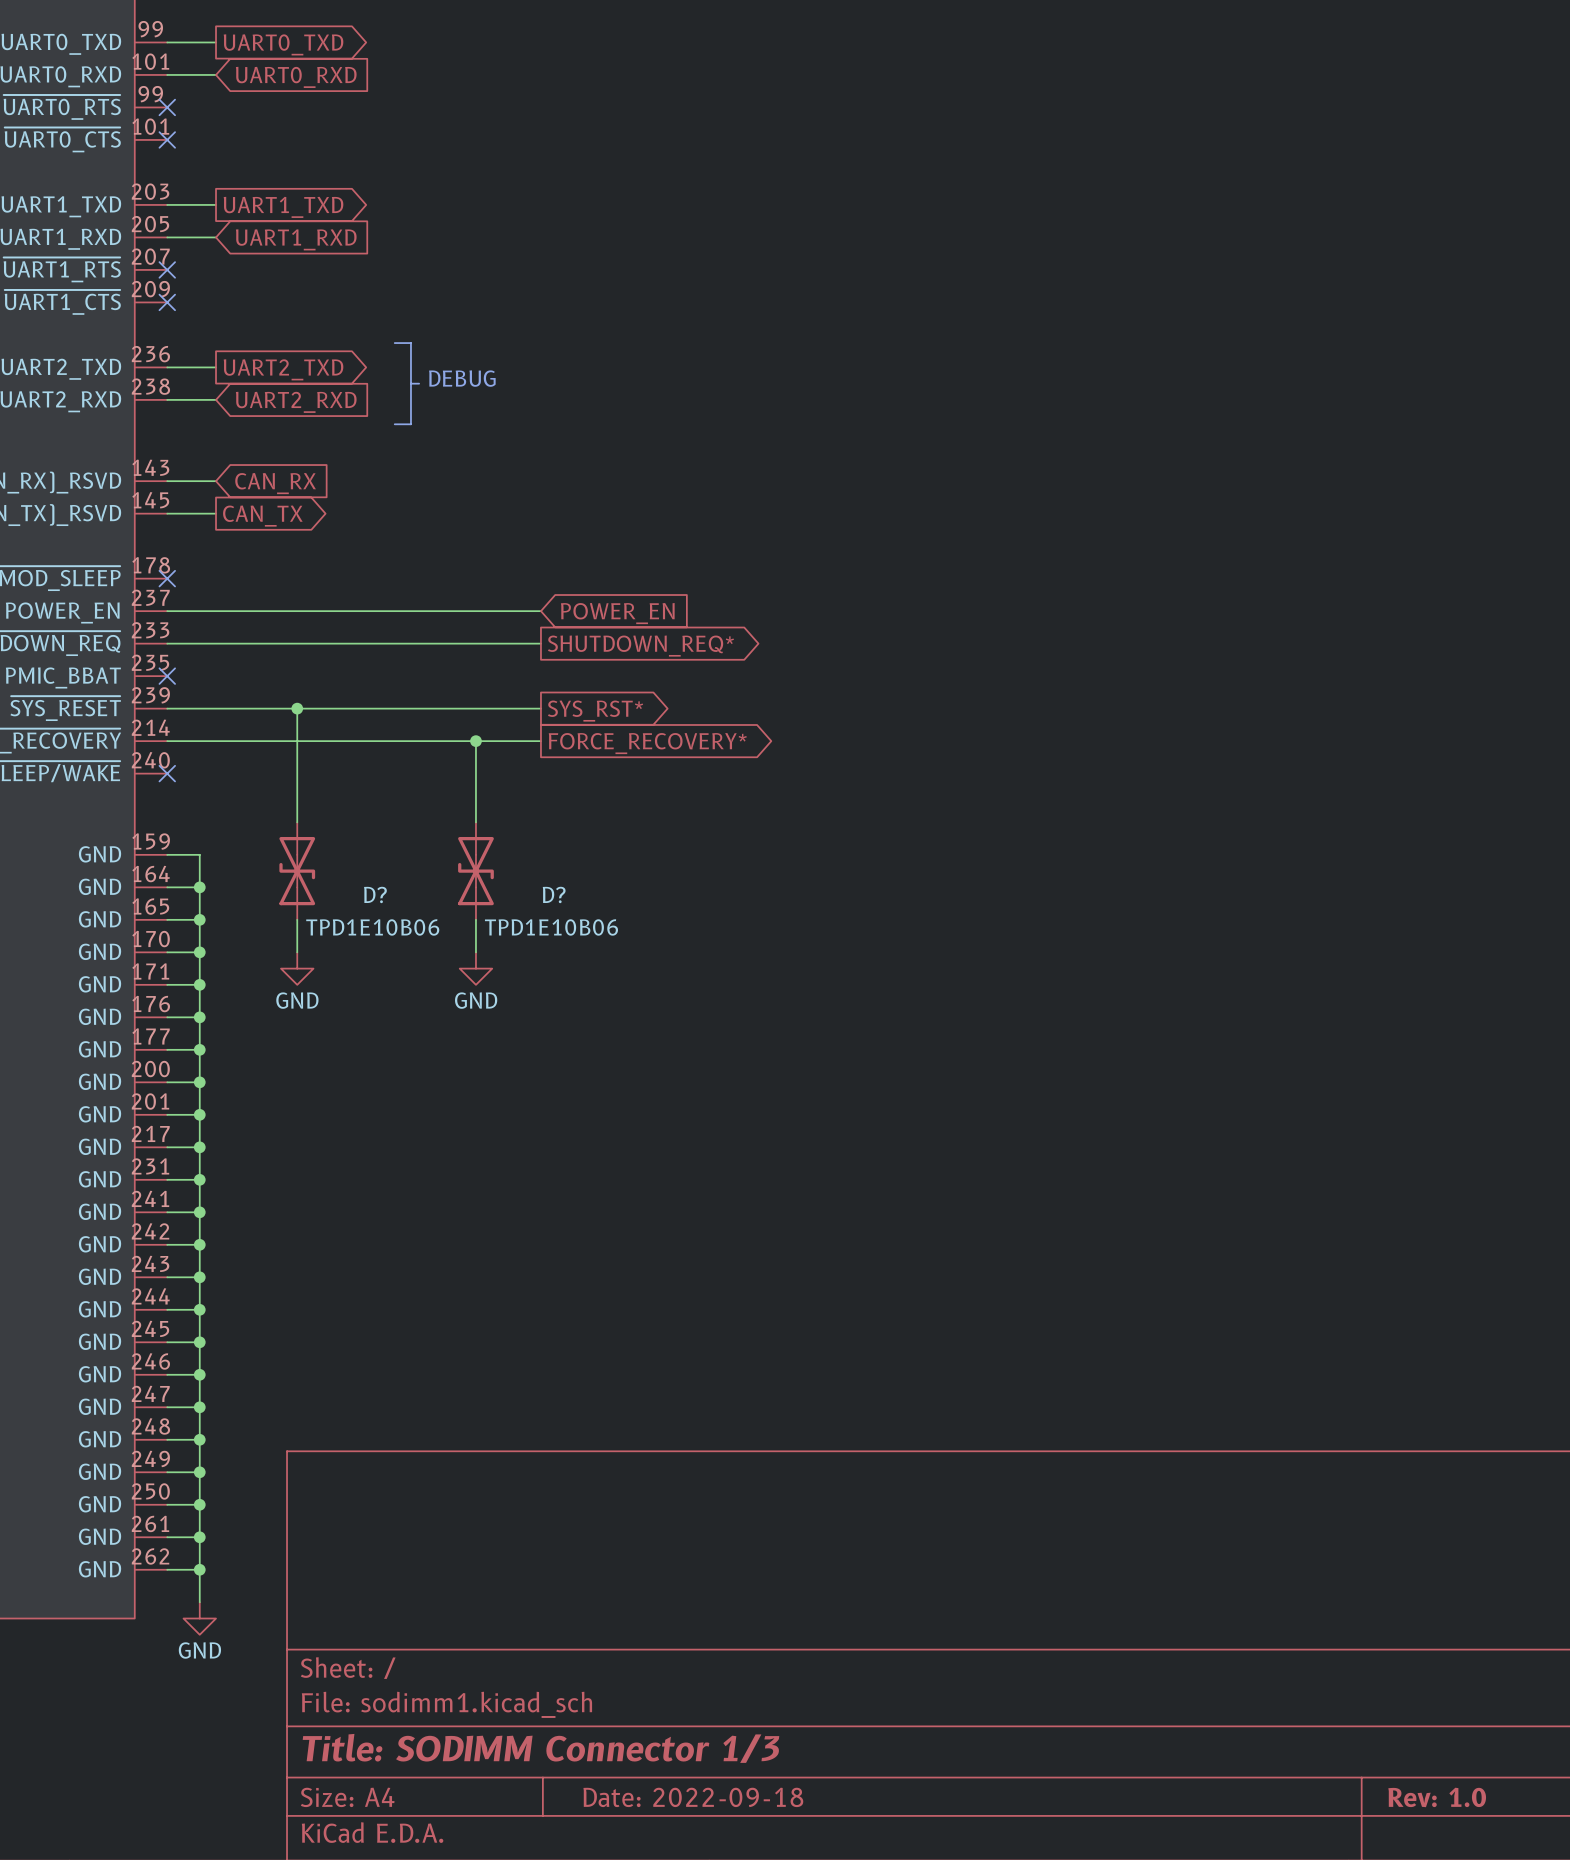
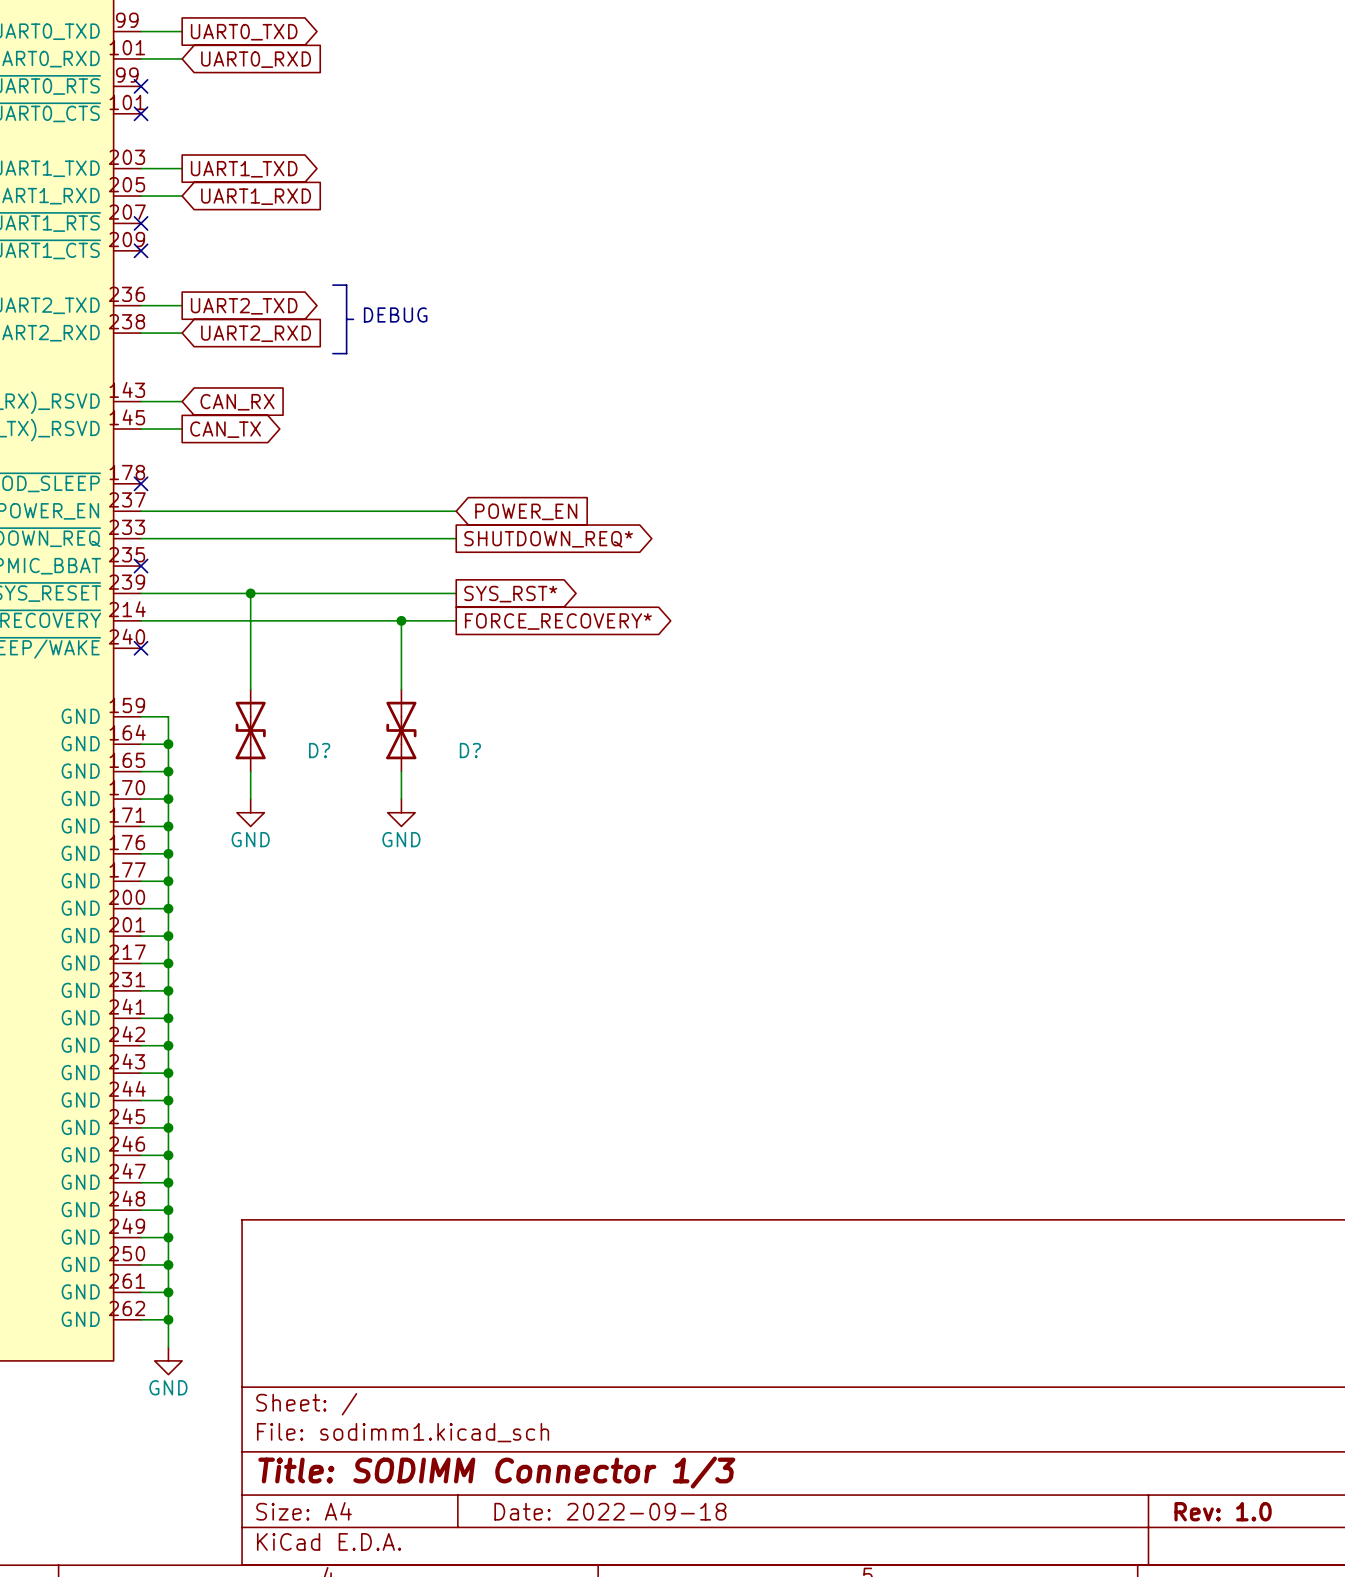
D? value: TPD1E10B06 (372, 927) -> none
D? value: TPD1E10B06 (551, 927) -> none

